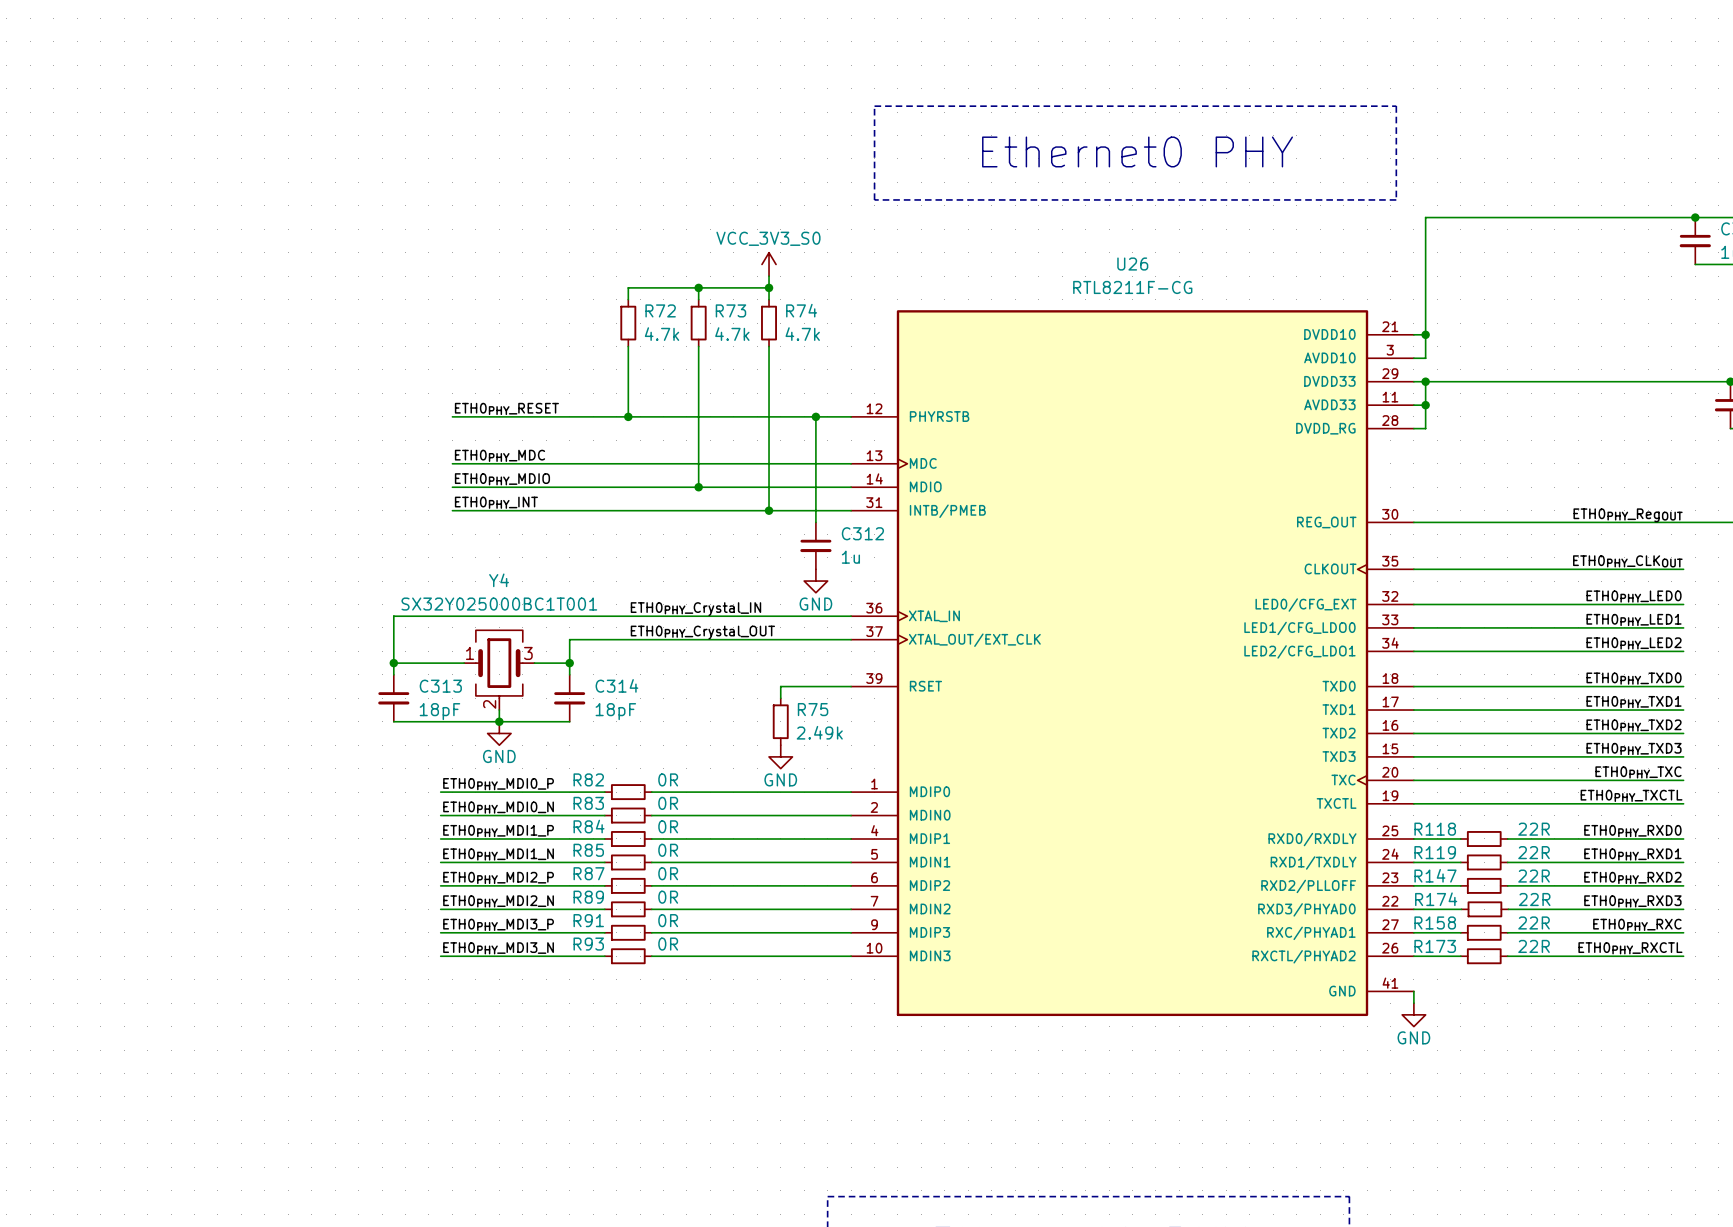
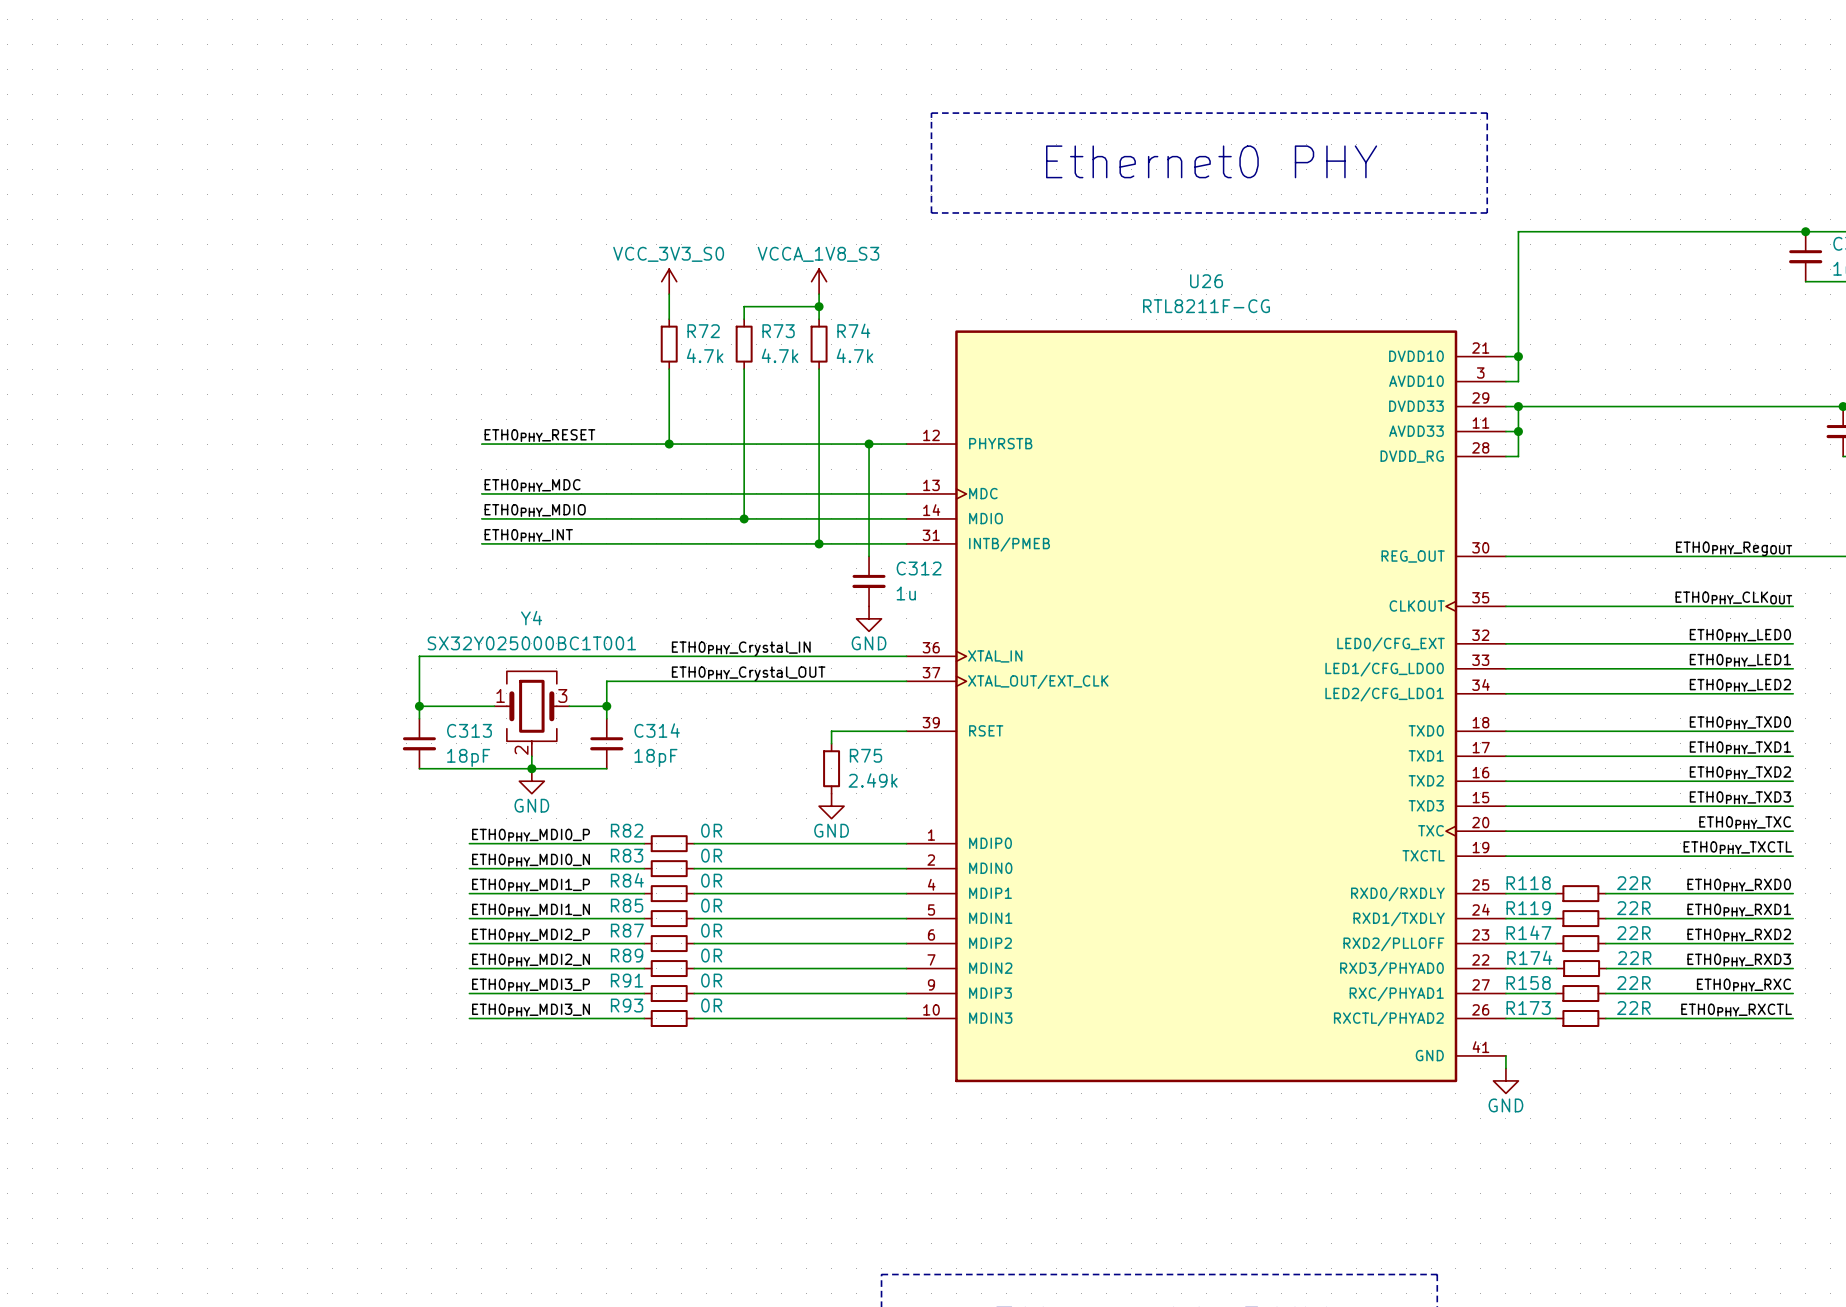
power symbol: none -> VCC_3V3_S0 (669, 281)
power symbol: VCC_3V3_S0 (769, 264) -> VCCA_1V8_S3 (819, 281)
wire: (628, 287) (698, 287) -> (669, 306) (669, 294)
junction: (698, 287) -> none

